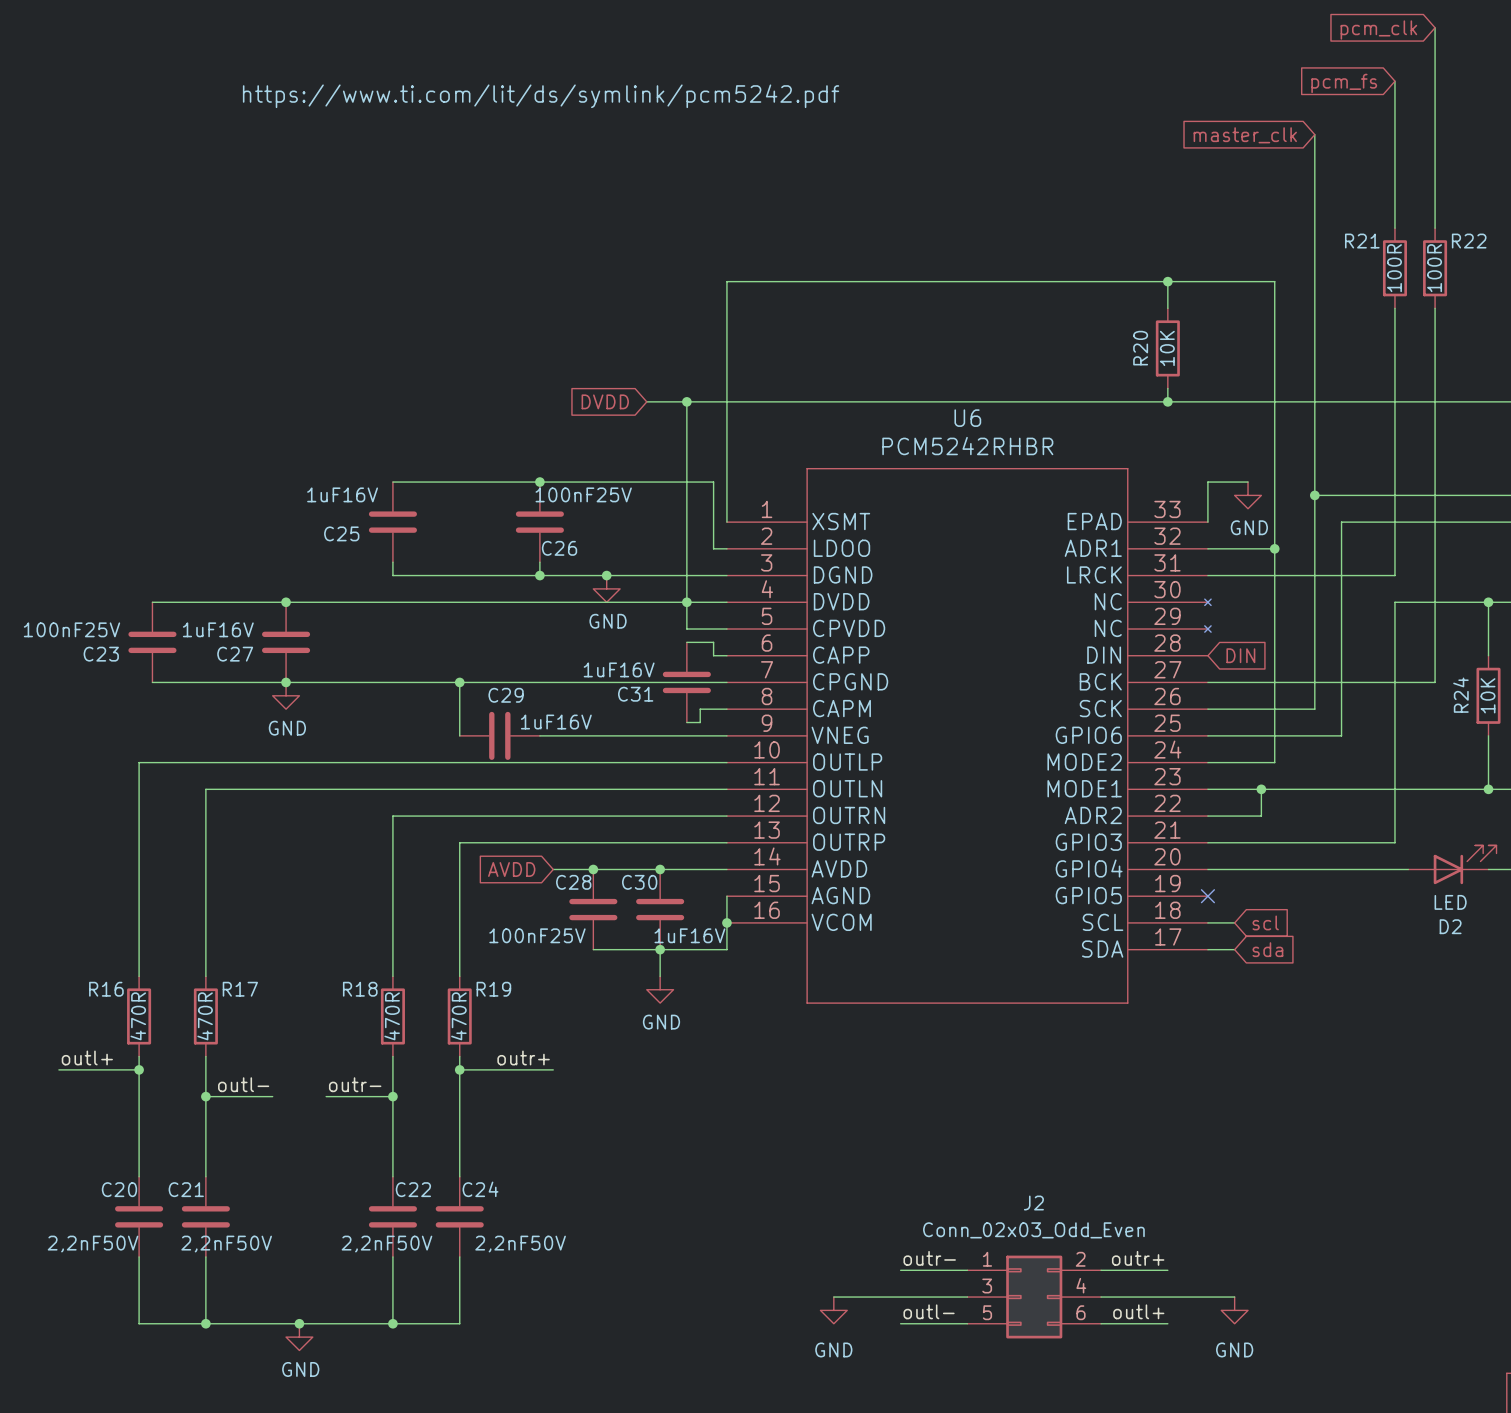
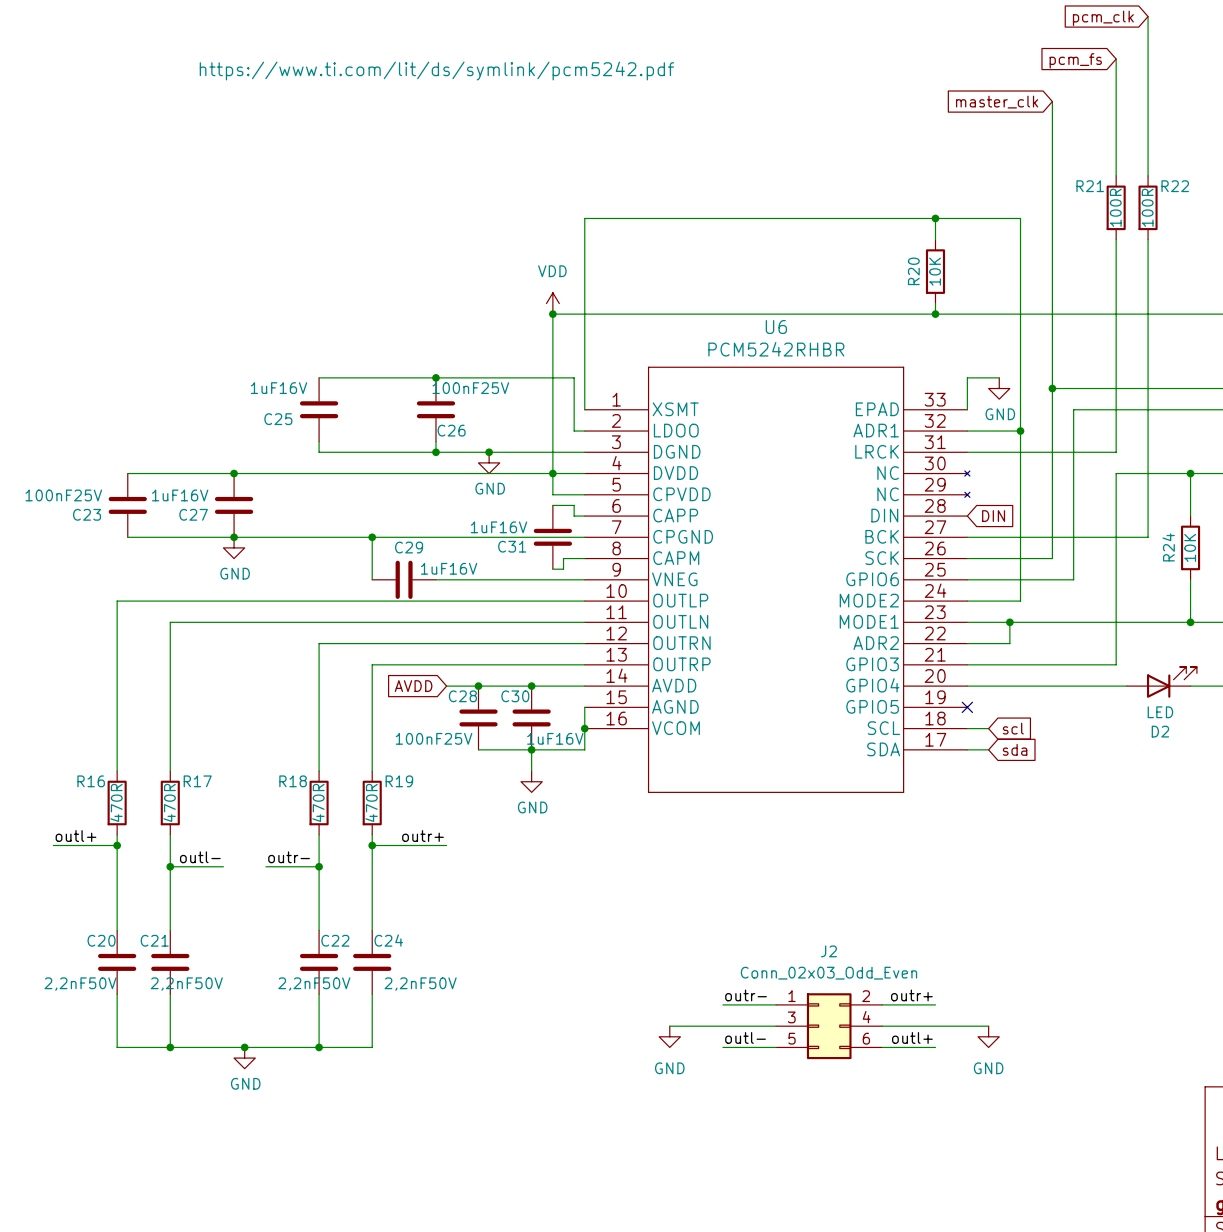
power symbol: none -> VDD (552, 303)
global label: DVDD (605, 401) -> none
wire: (646, 401) (686, 401) -> none

